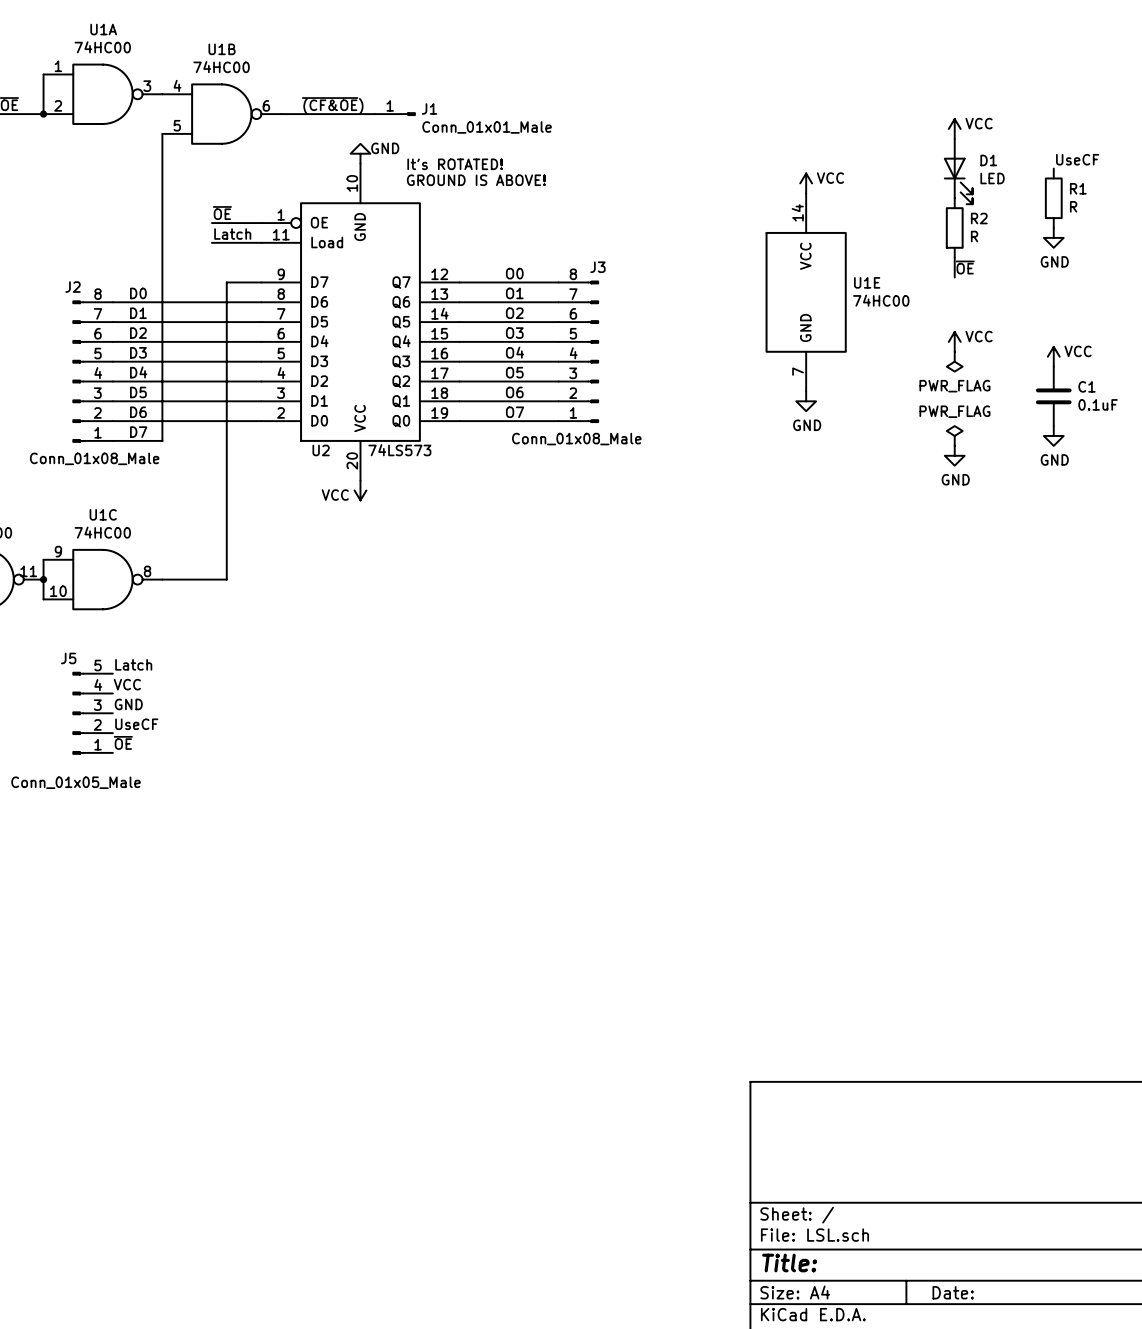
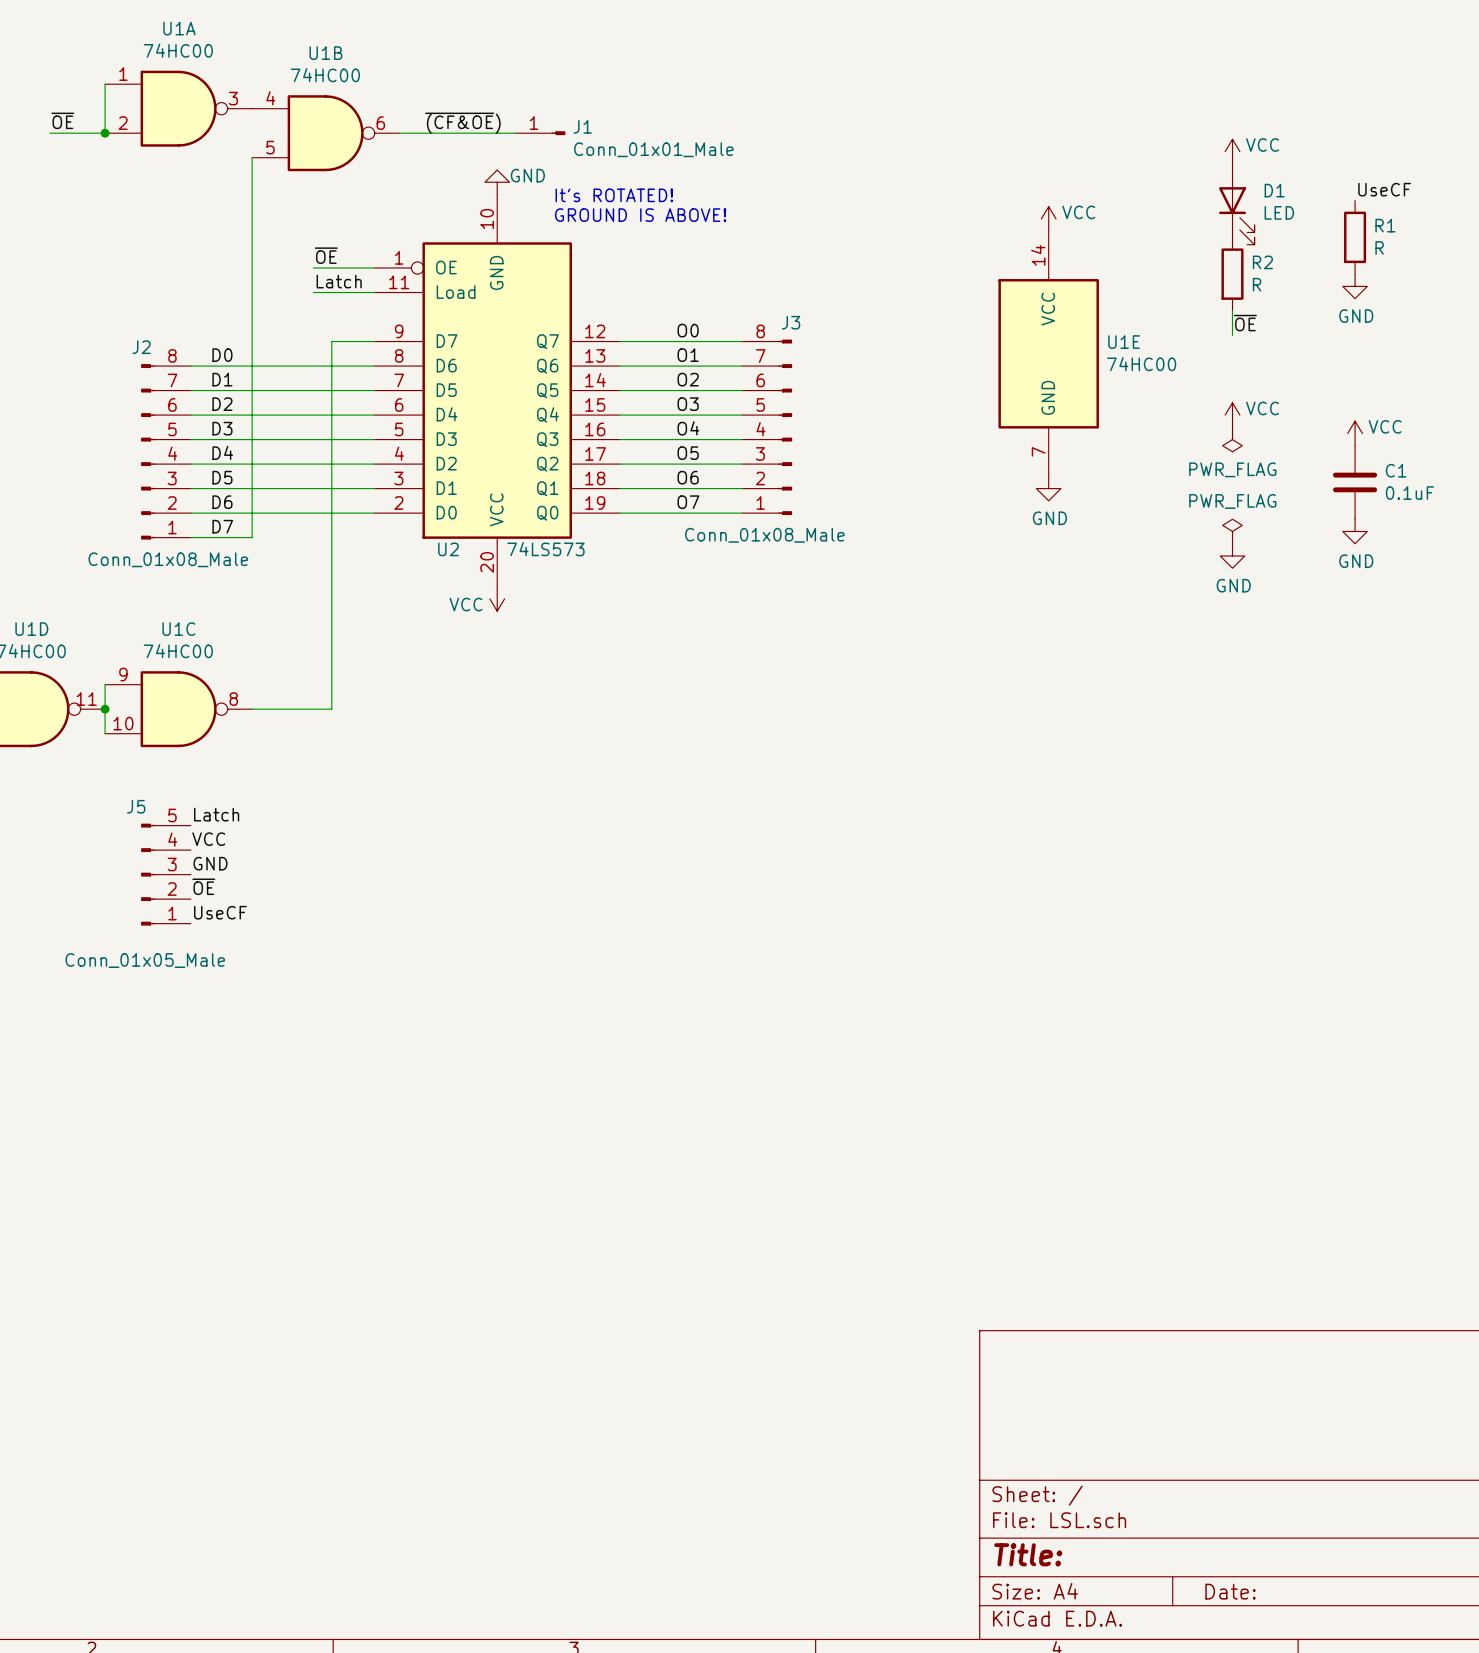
label: UseCF (136, 724) -> ~{OE} (203, 886)
label: ~{OE} (123, 742) -> UseCF (220, 912)

